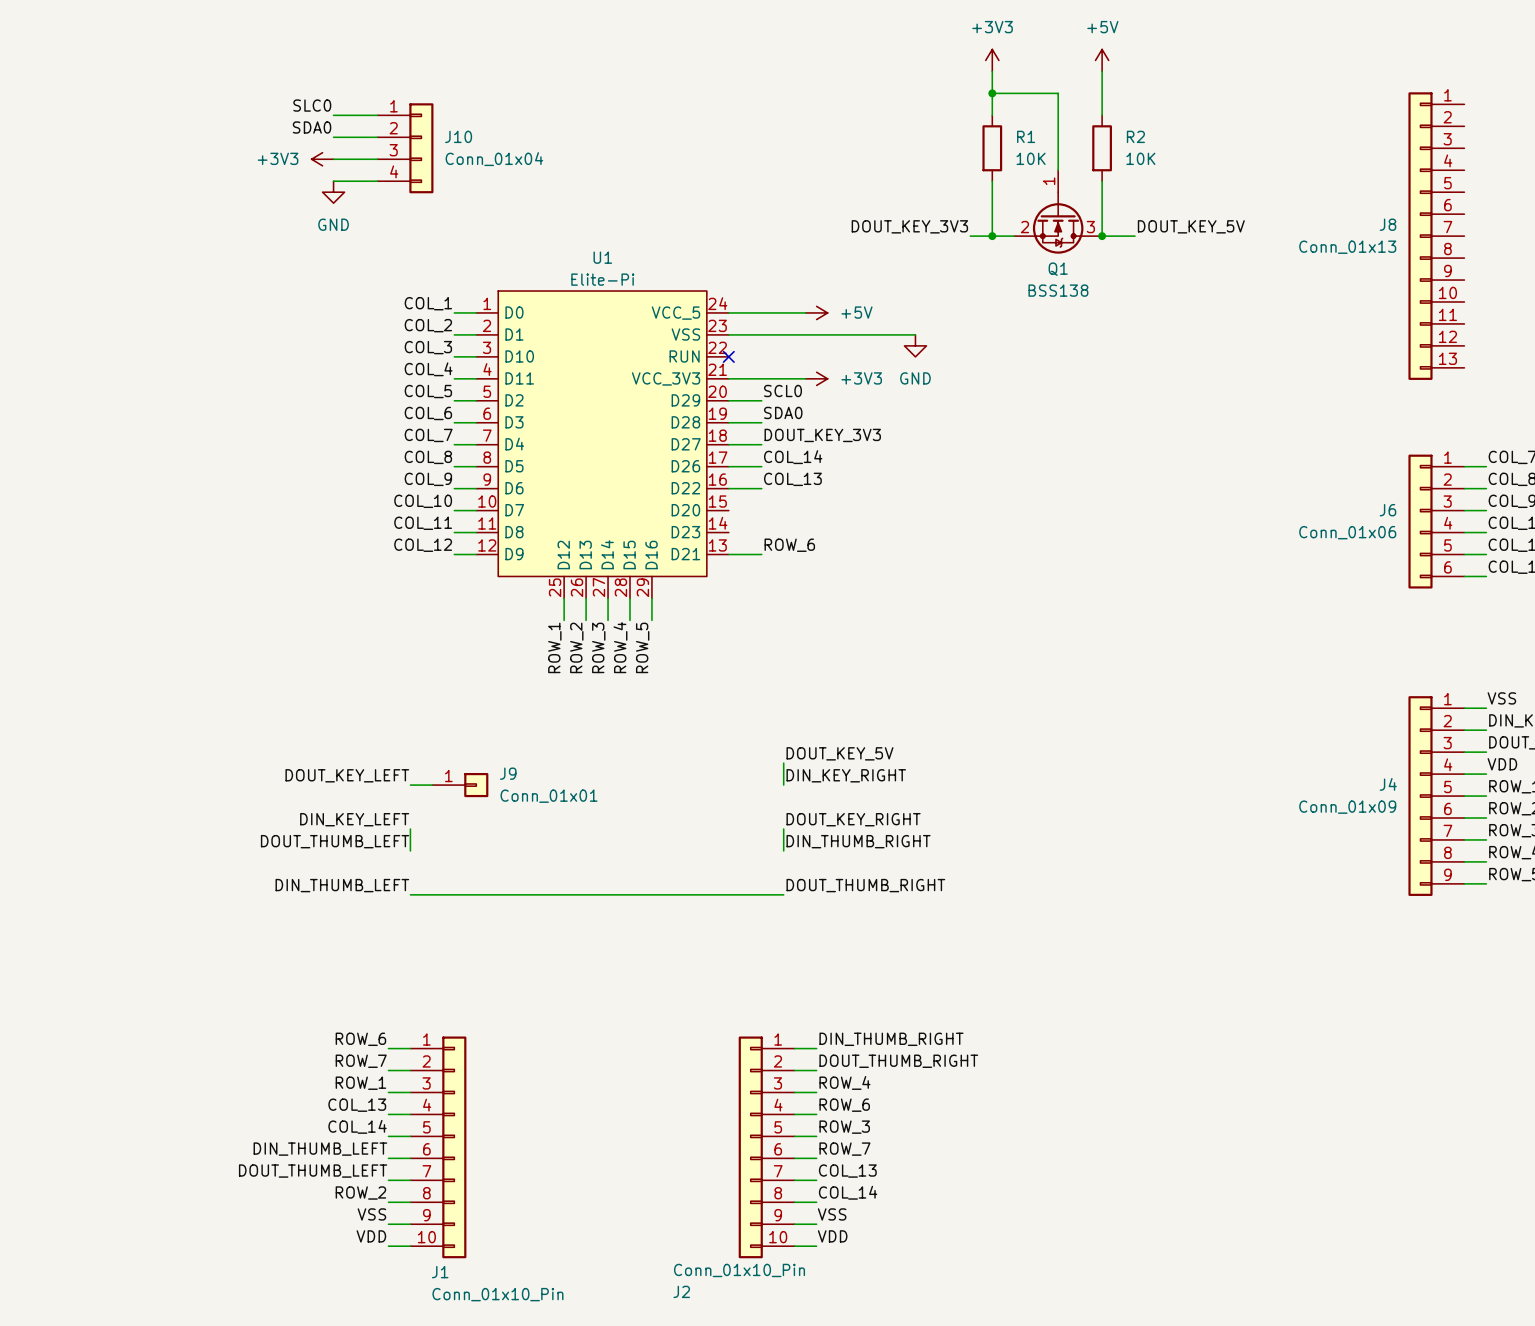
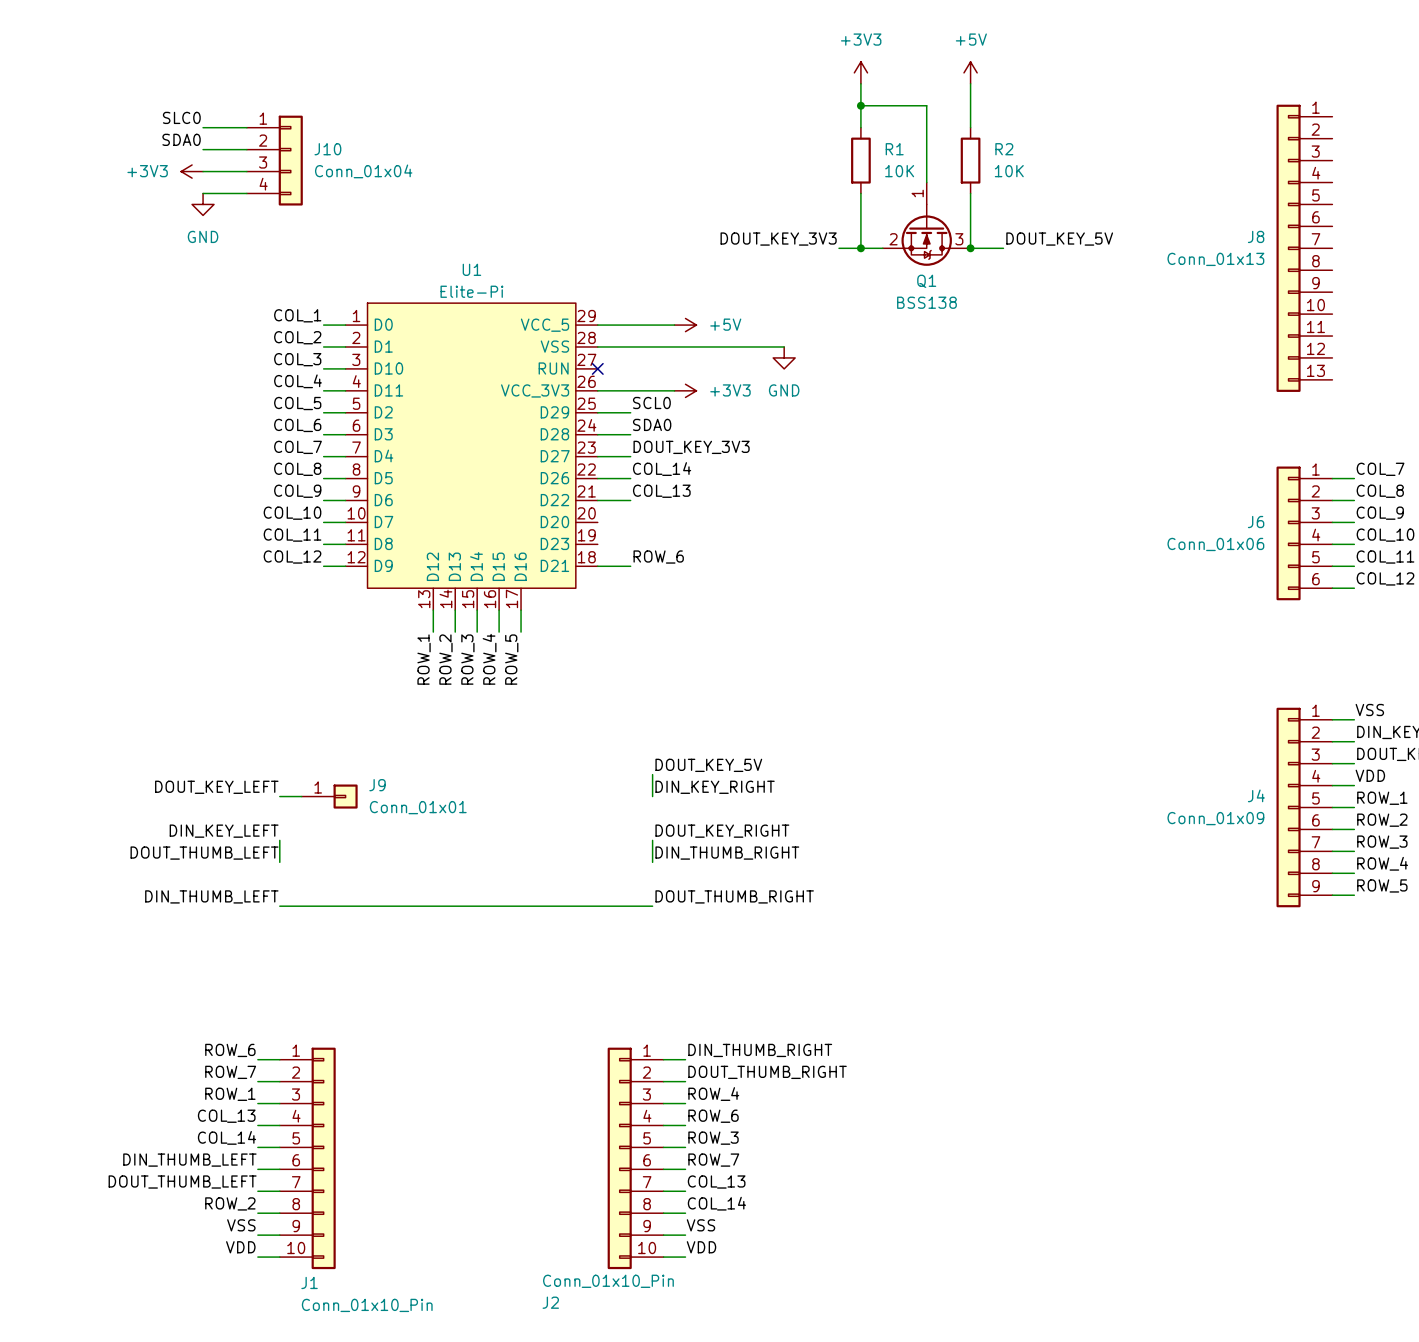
U1 symbol: [476, 291, 729, 599] -> [345, 303, 598, 611]

